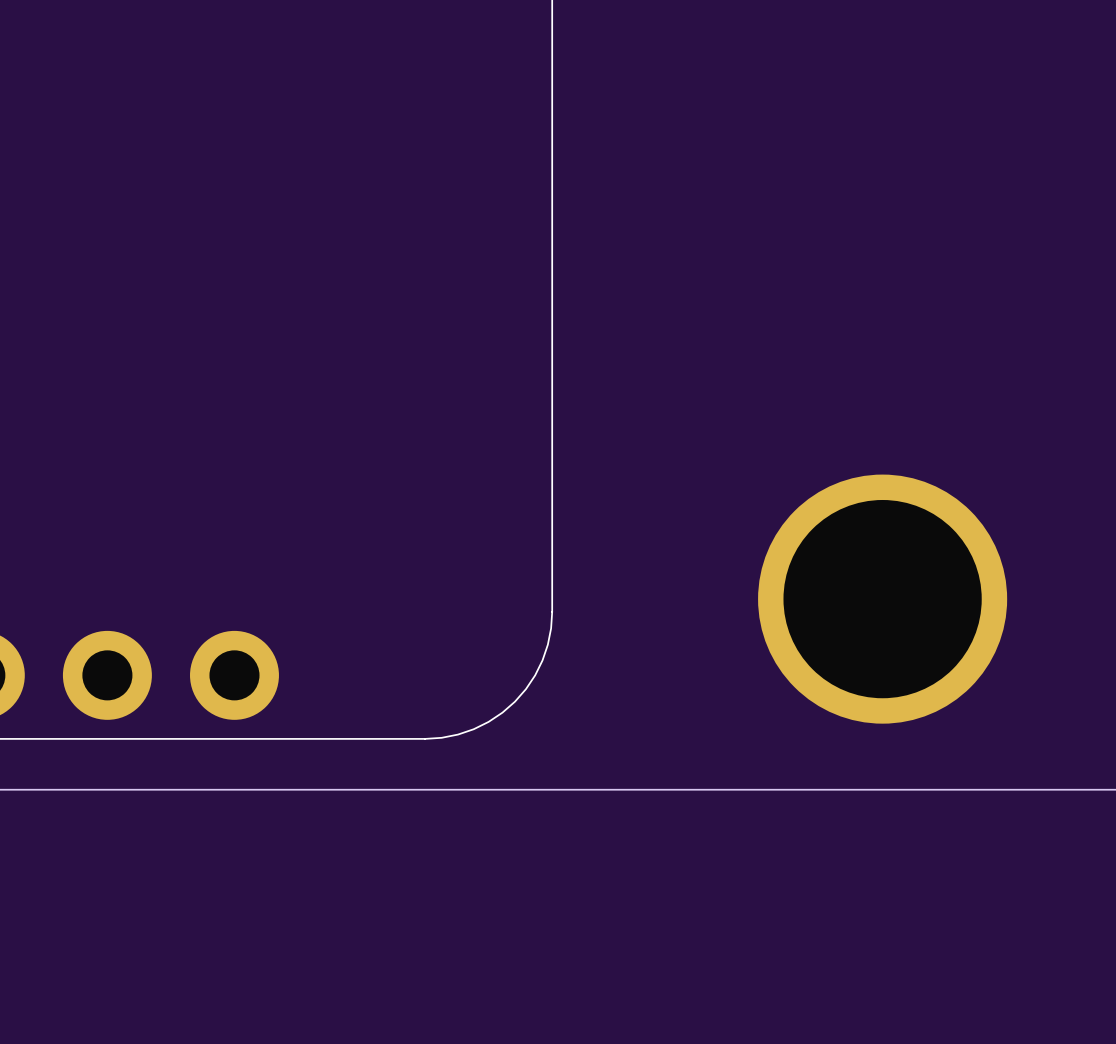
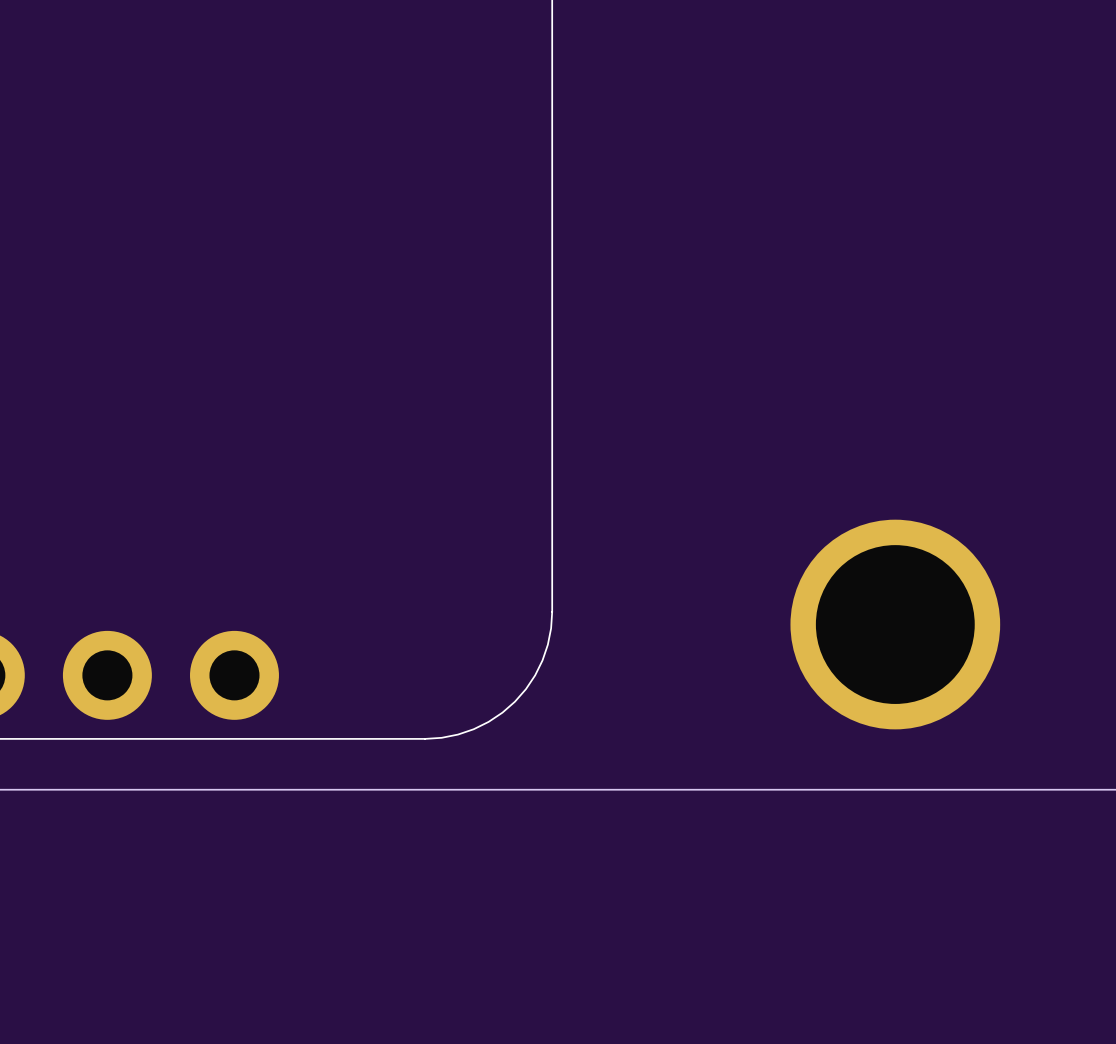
part footprint: [758, 474, 1008, 724] -> [790, 519, 1001, 730]

